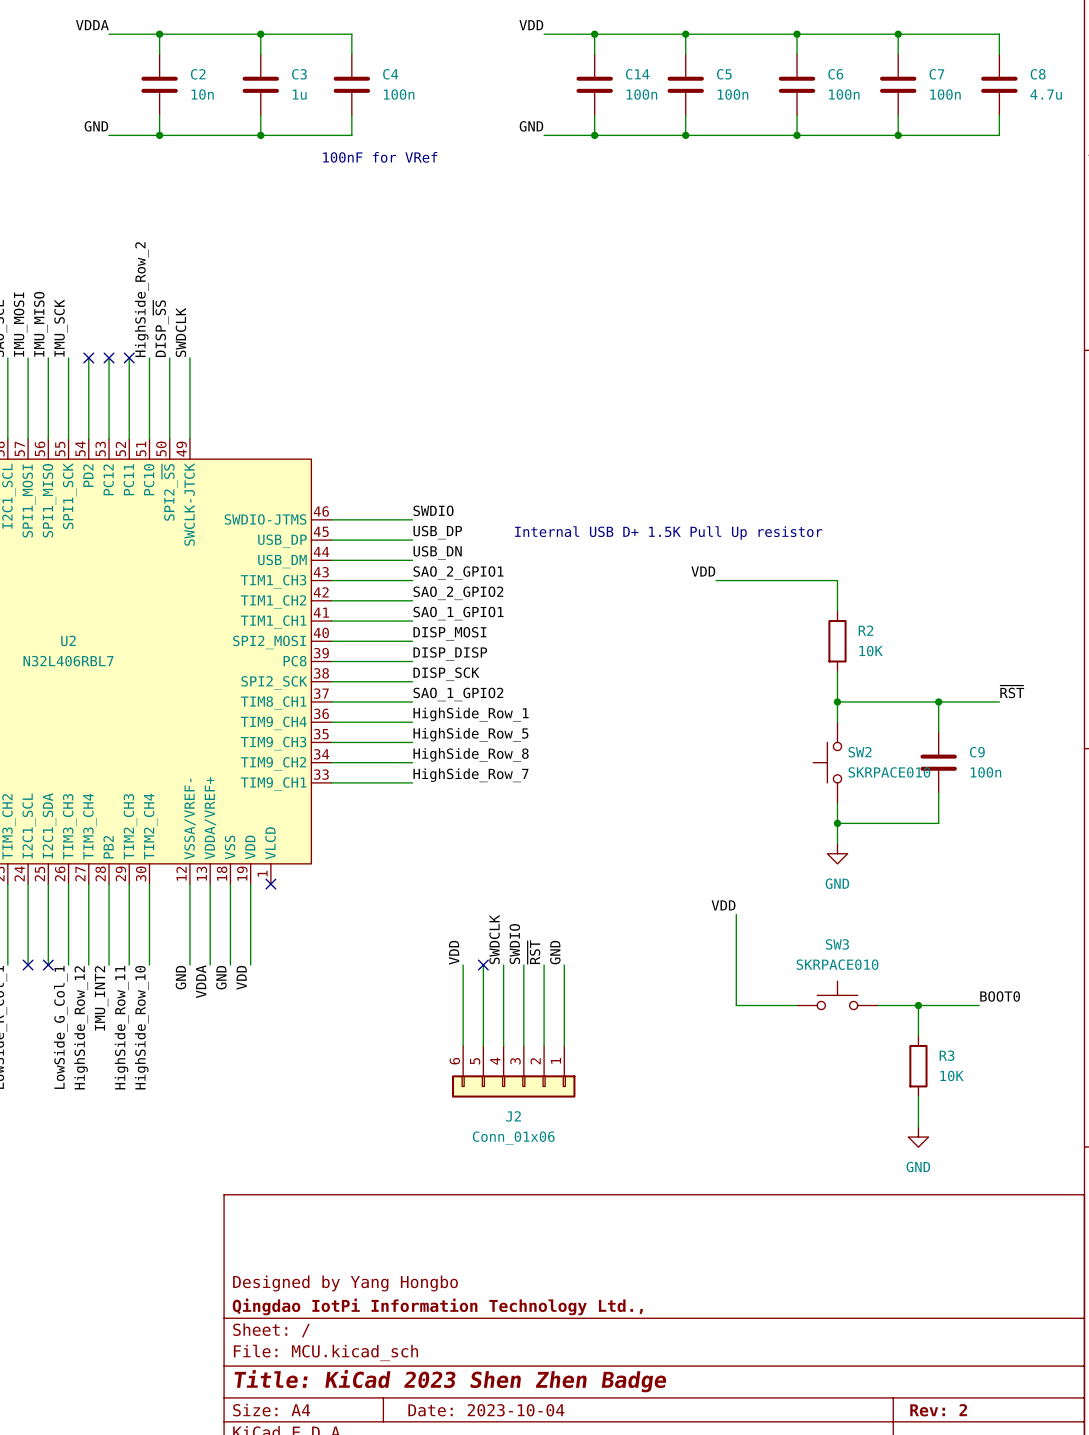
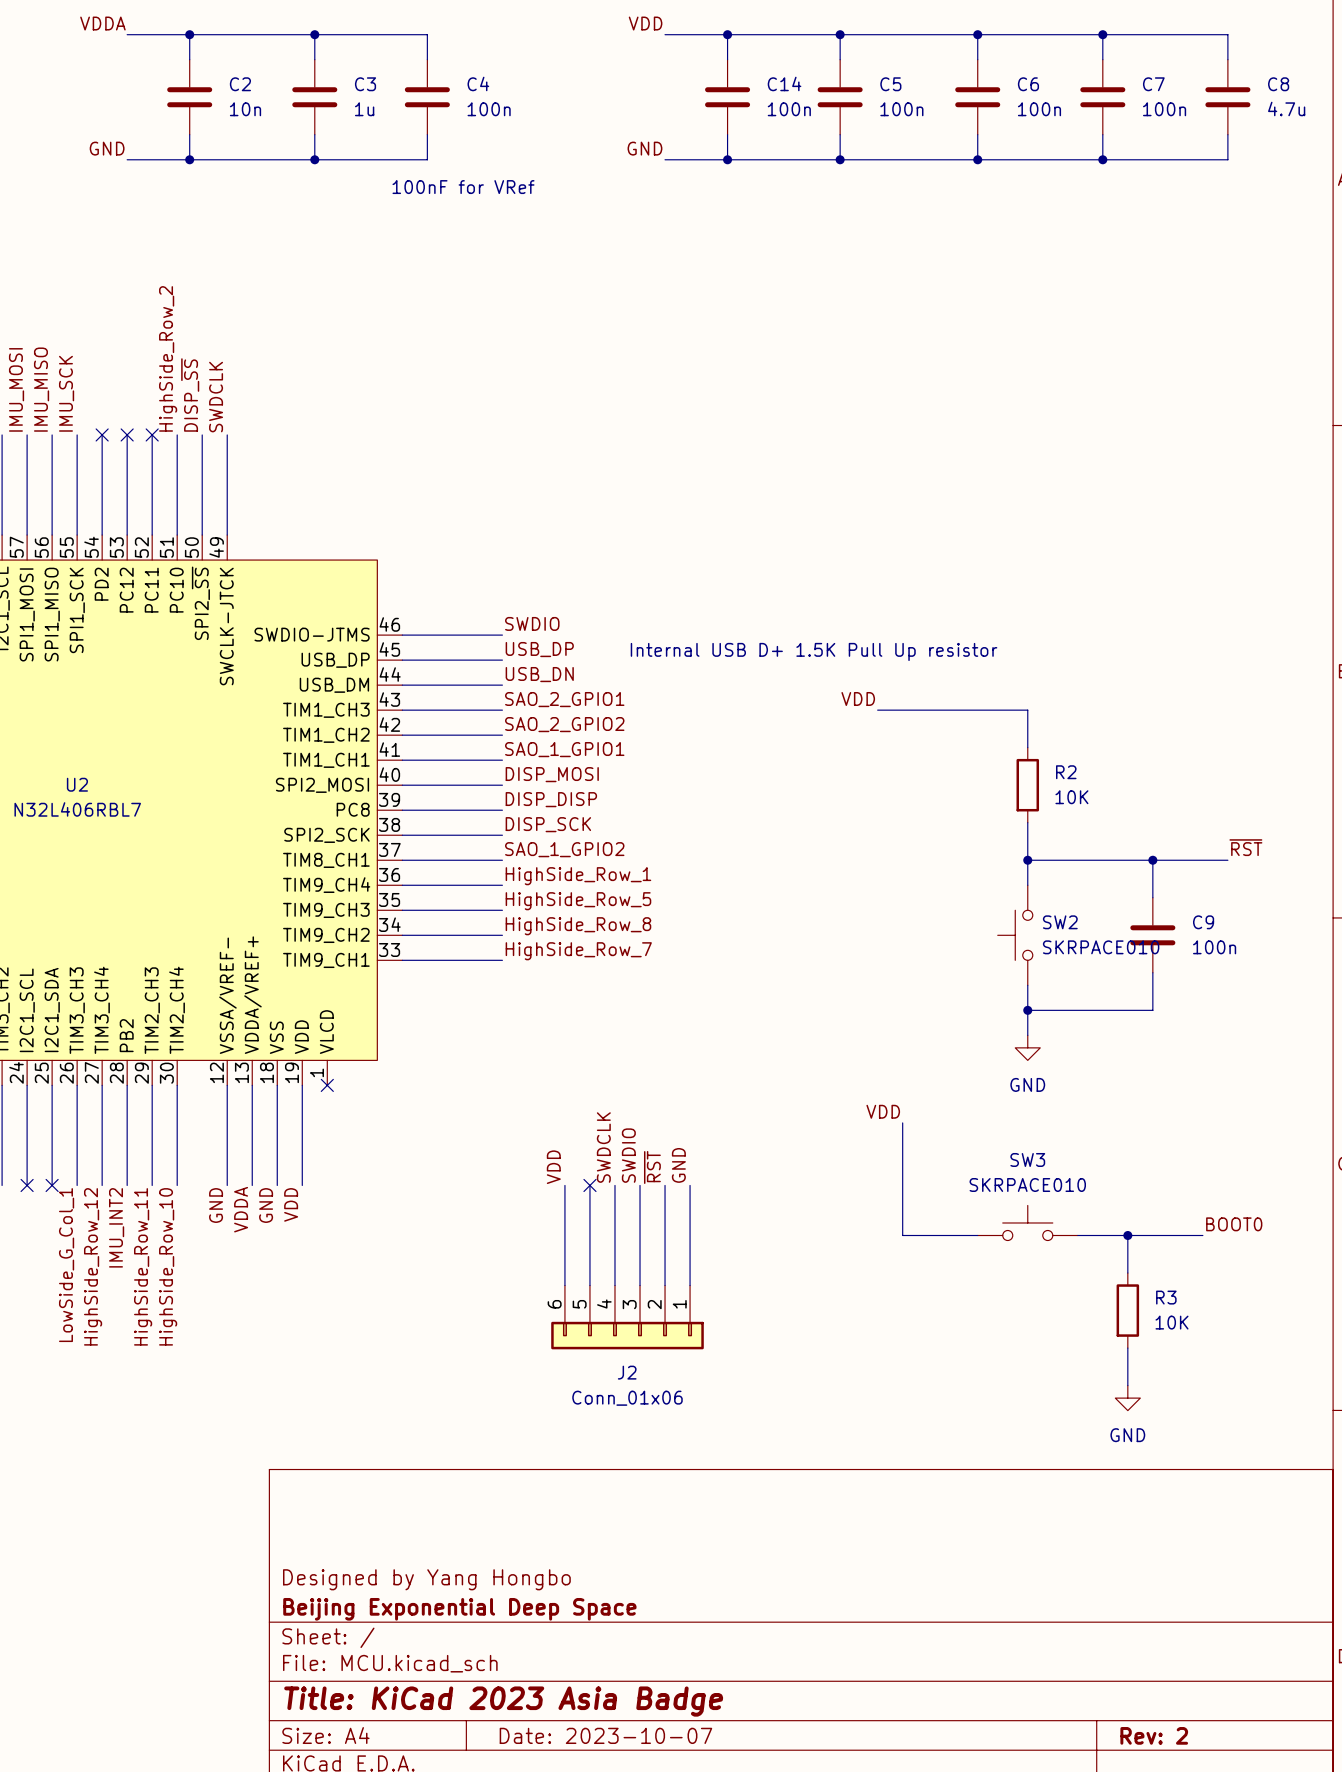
title block: Qingdao IotPi Information Technology Ltd., (437, 1306) -> Beijing Exponential Deep Space (459, 1609)
title block: Title: KiCad 2023 Shen Zhen Badge (450, 1381) -> Title: KiCad 2023 Asia Badge (503, 1701)
title block: Date: 2023-10-04 (486, 1410) -> Date: 2023-10-07 (605, 1735)

